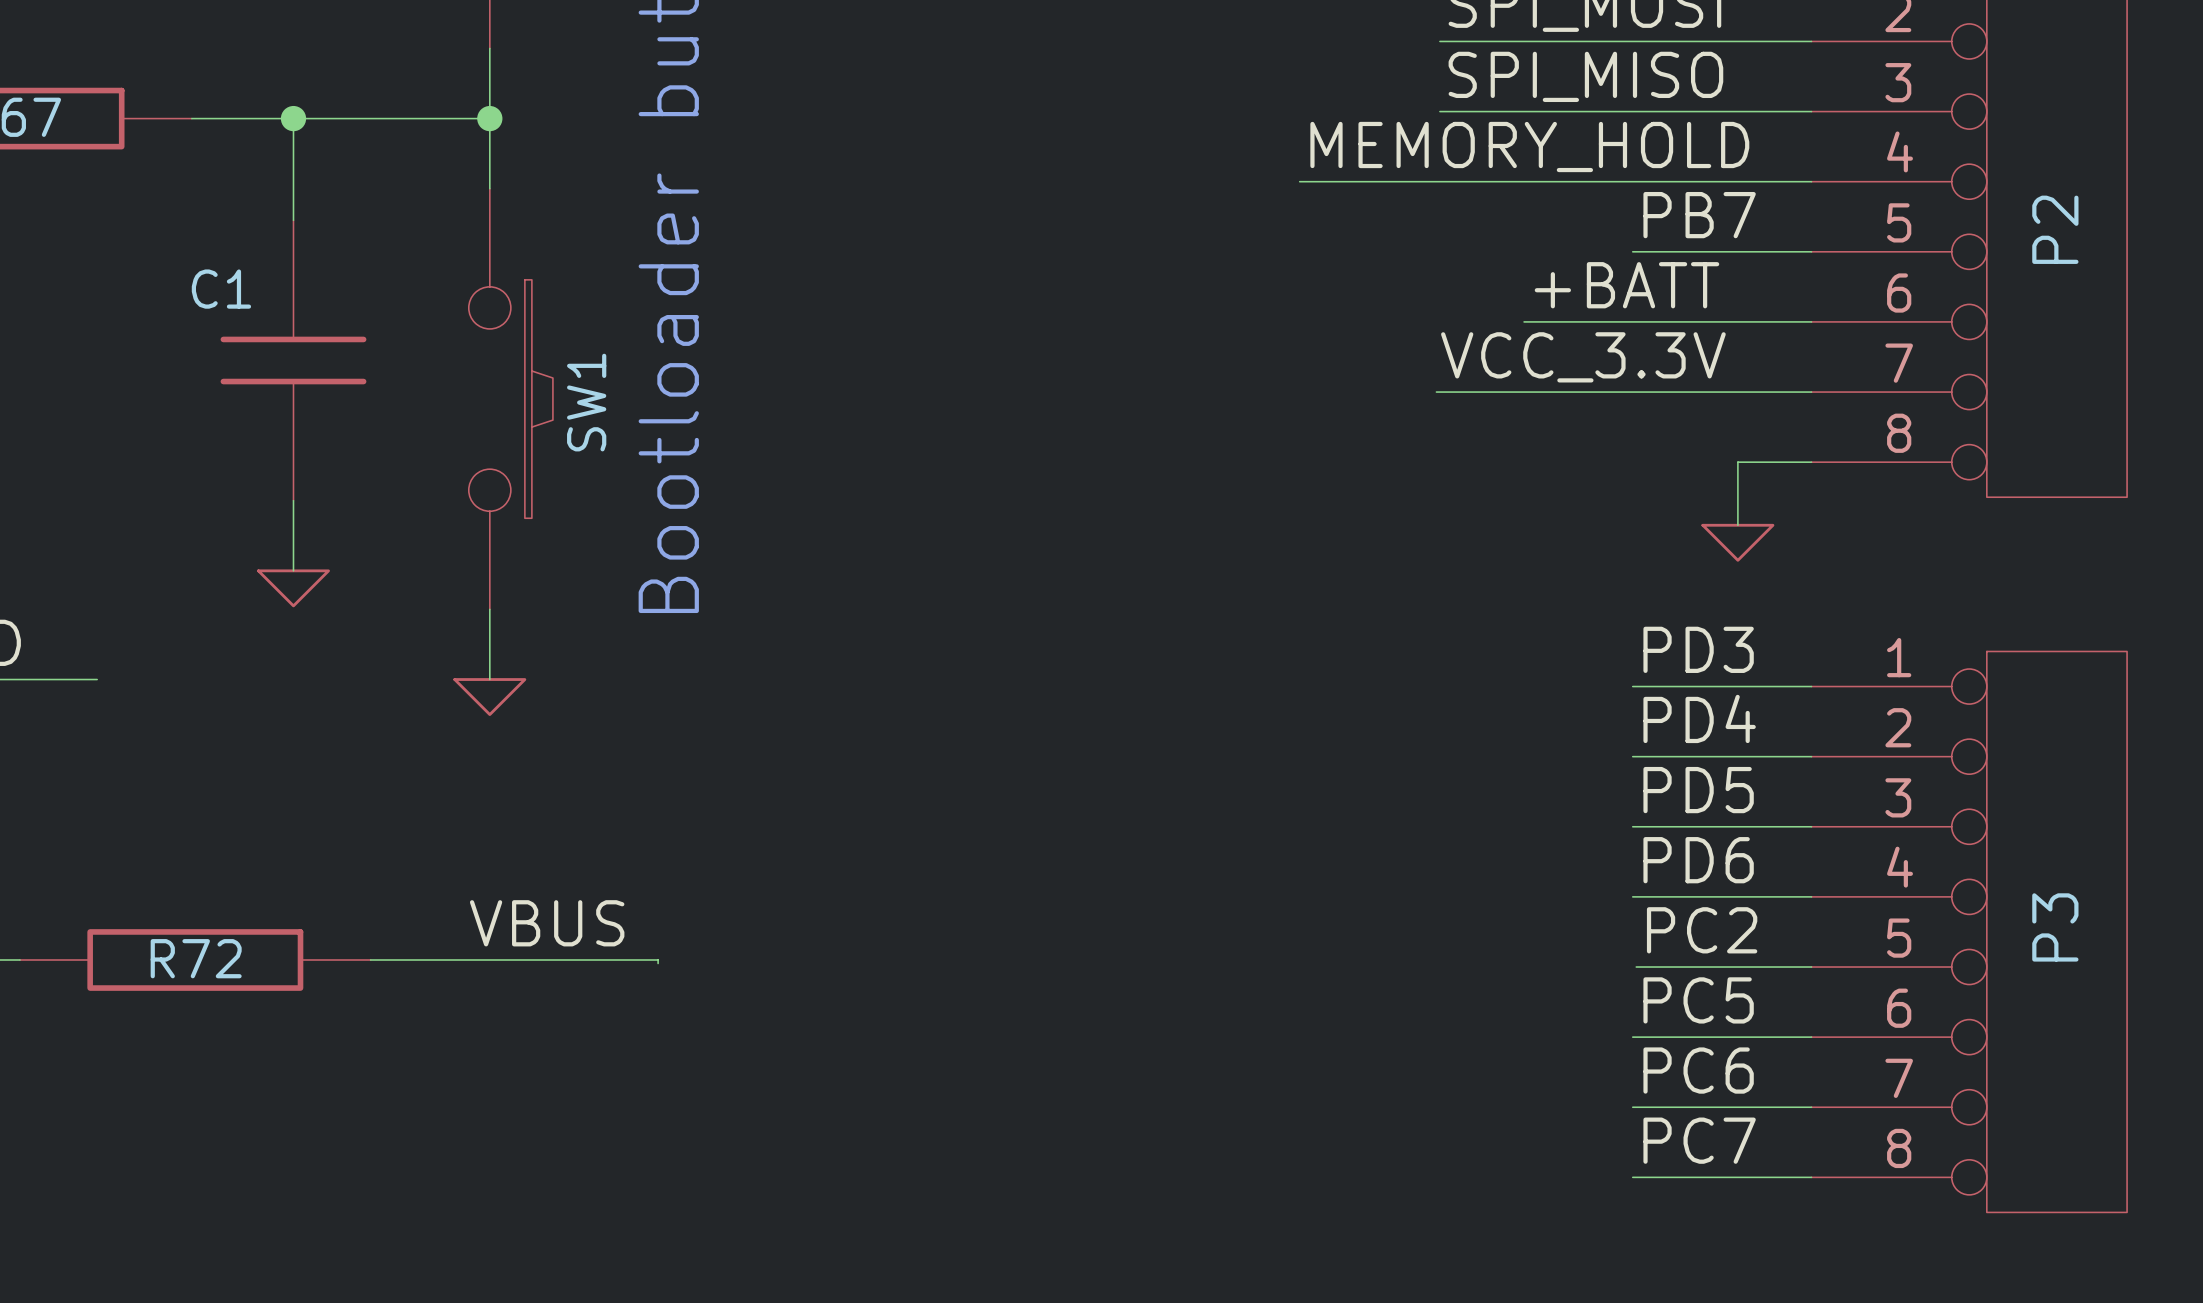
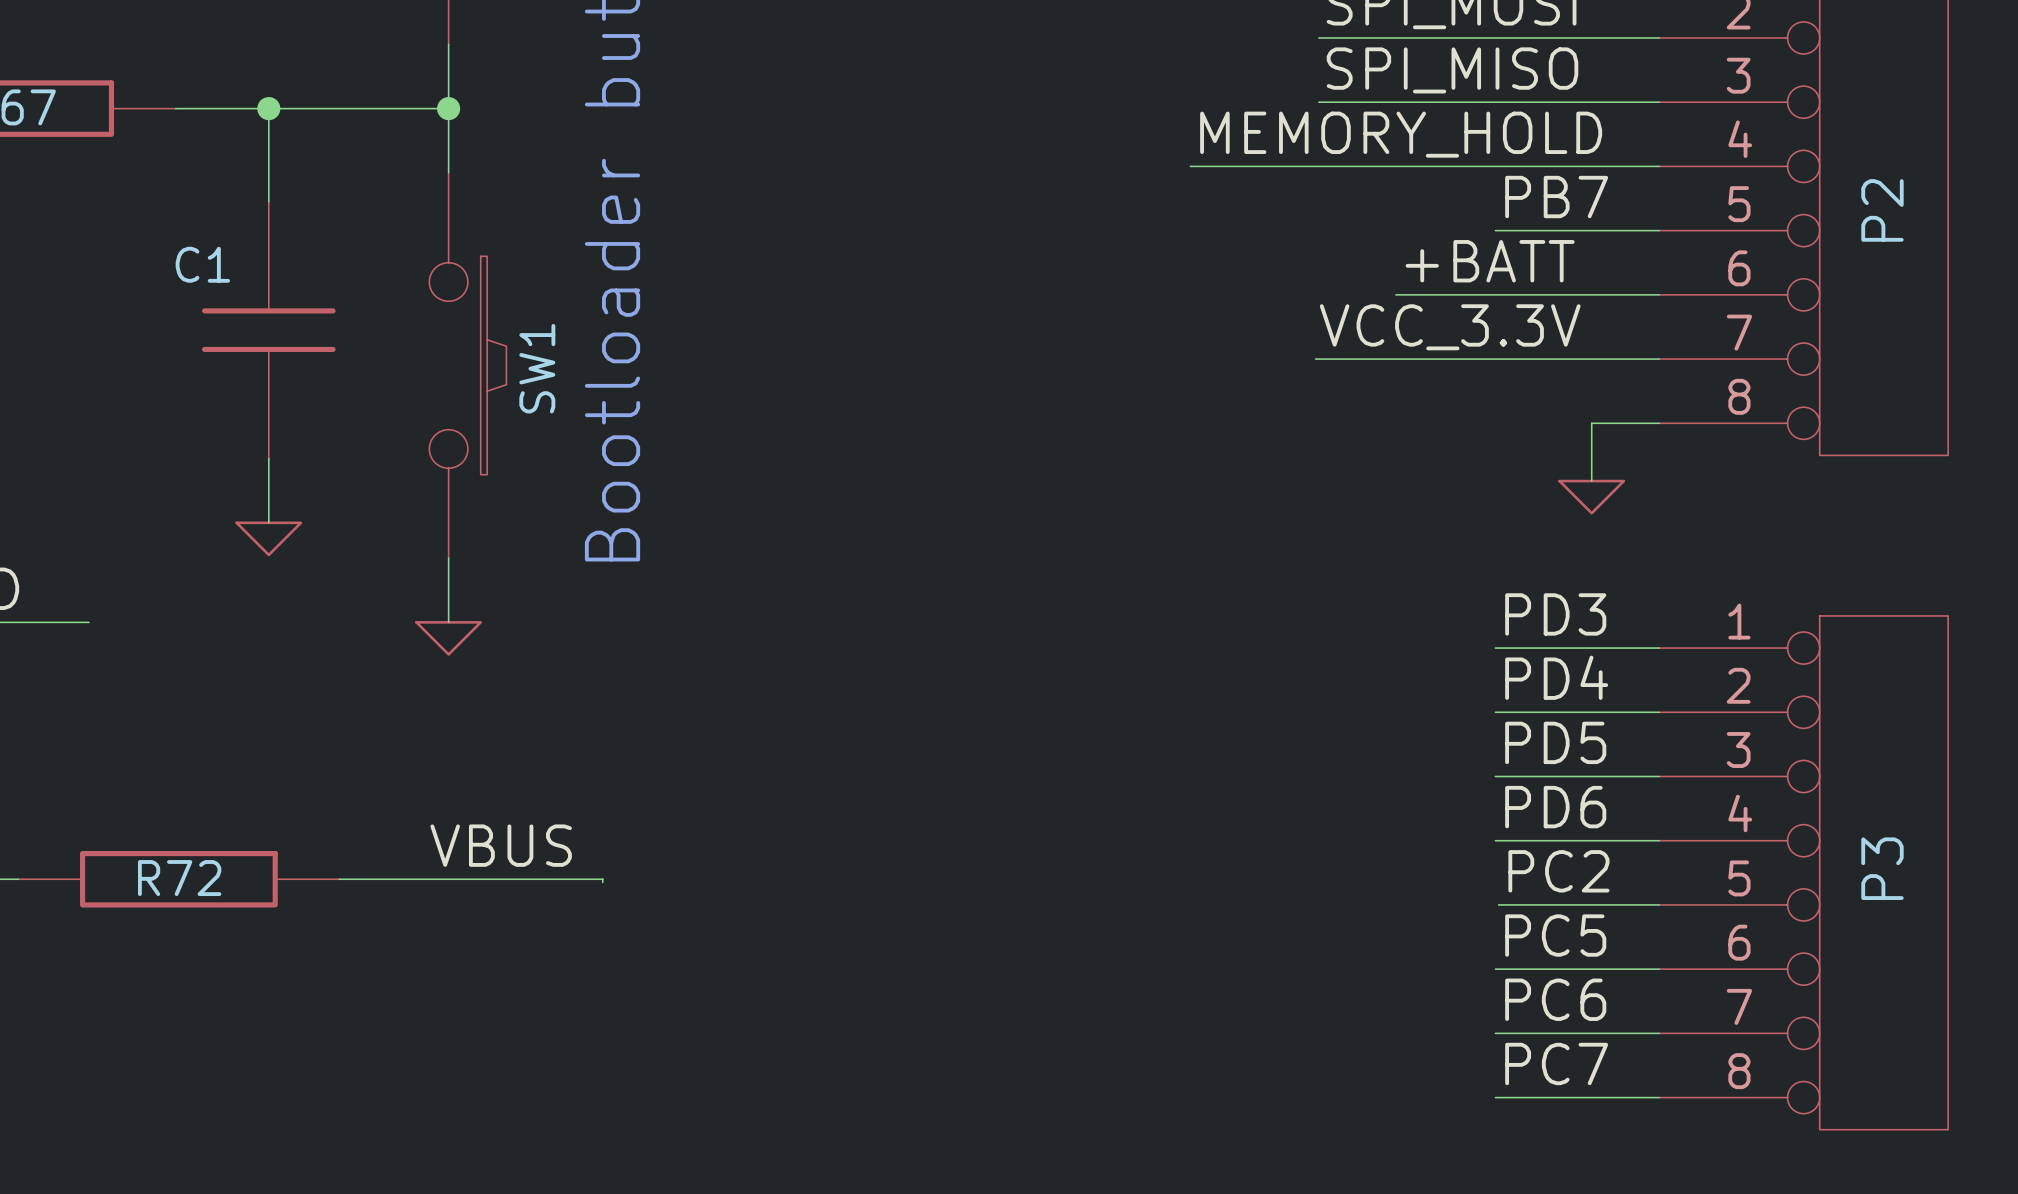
label position: PD3 (1698, 649) -> PD3 (1555, 614)
wire: (1632, 686) (1811, 686) -> (1495, 648) (1659, 648)
label position: PD4 (1699, 718) -> PD4 (1556, 677)
wire: (1632, 756) (1811, 756) -> (1495, 712) (1659, 712)
label position: PD5 (1698, 790) -> PD5 (1555, 742)
wire: (1632, 826) (1811, 826) -> (1495, 776) (1659, 776)
label position: PD6 (1698, 860) -> PD6 (1555, 807)
wire: (1632, 896) (1811, 896) -> (1495, 840) (1659, 840)
label position: PC2 (1702, 930) -> PC2 (1558, 871)
P3 position: (1969, 931) -> (1803, 872)
wire: (1636, 967) (1811, 967) -> (1498, 904) (1659, 904)
label position: PC5 (1698, 1000) -> PC5 (1555, 935)
wire: (1632, 1037) (1811, 1037) -> (1495, 969) (1659, 969)
label position: PC6 (1698, 1070) -> PC6 (1555, 999)
wire: (1632, 1107) (1811, 1107) -> (1495, 1033) (1659, 1033)
label position: PC7 (1699, 1140) -> PC7 (1556, 1063)
wire: (1632, 1177) (1811, 1177) -> (1495, 1097) (1659, 1097)

